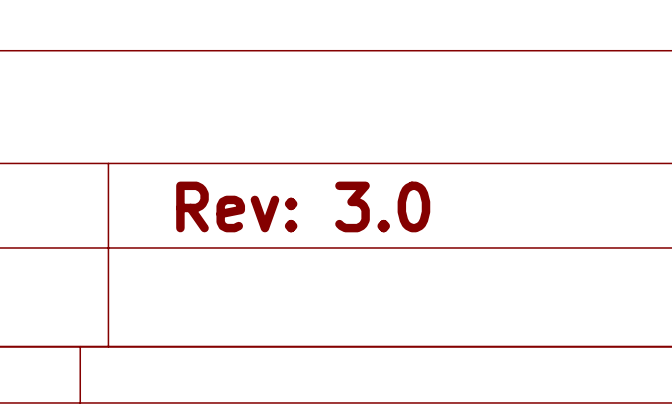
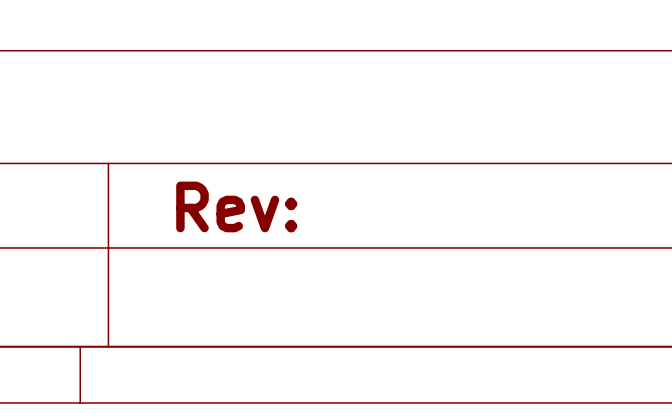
title block: Rev: 3.0 (303, 206) -> Rev: (236, 206)

